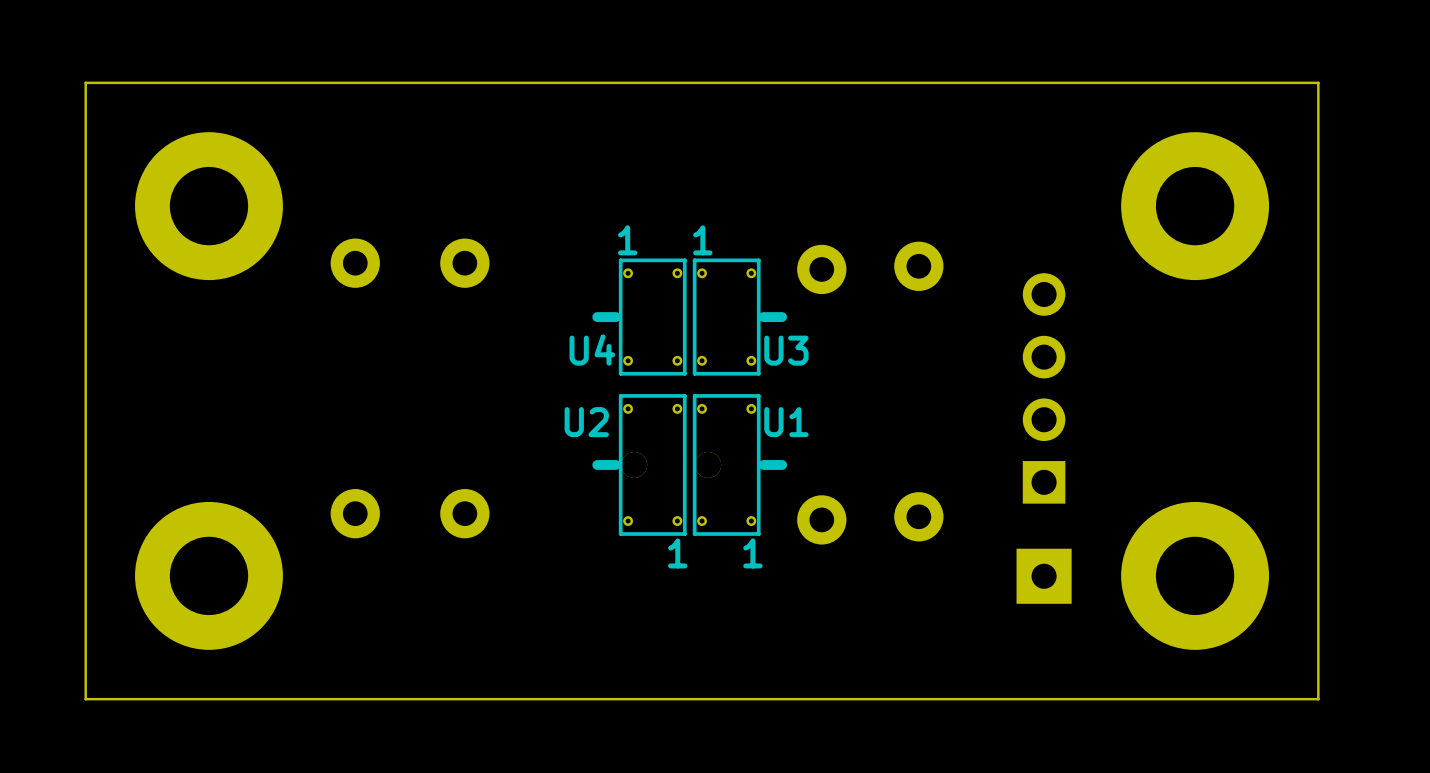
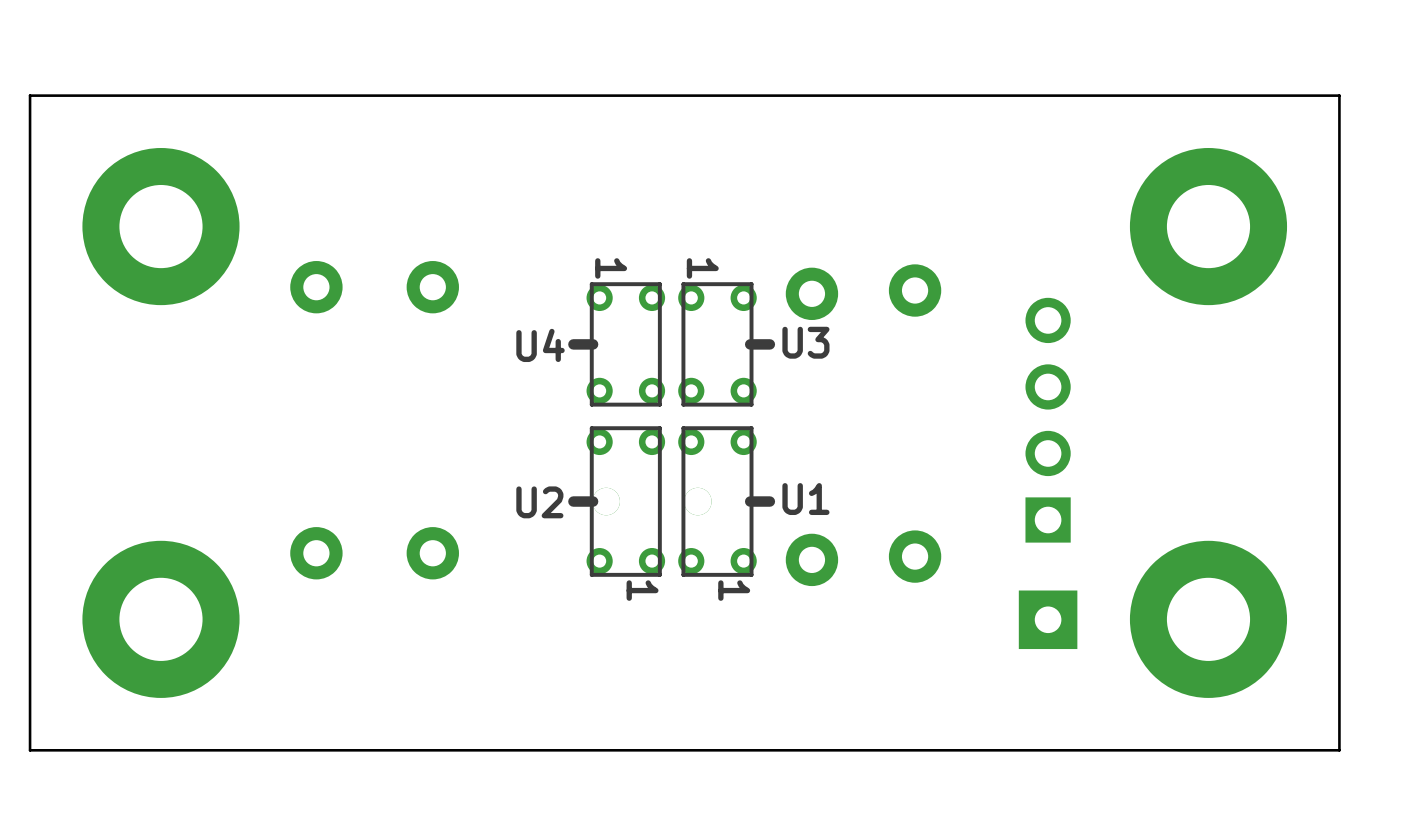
U4 footprint: [618, 258, 687, 376] -> [586, 282, 666, 407]
U3 footprint: [692, 258, 761, 376] -> [678, 282, 757, 407]
U2 footprint: [618, 394, 687, 536] -> [586, 426, 666, 577]
U1 footprint: [692, 394, 761, 536] -> [678, 426, 757, 577]

